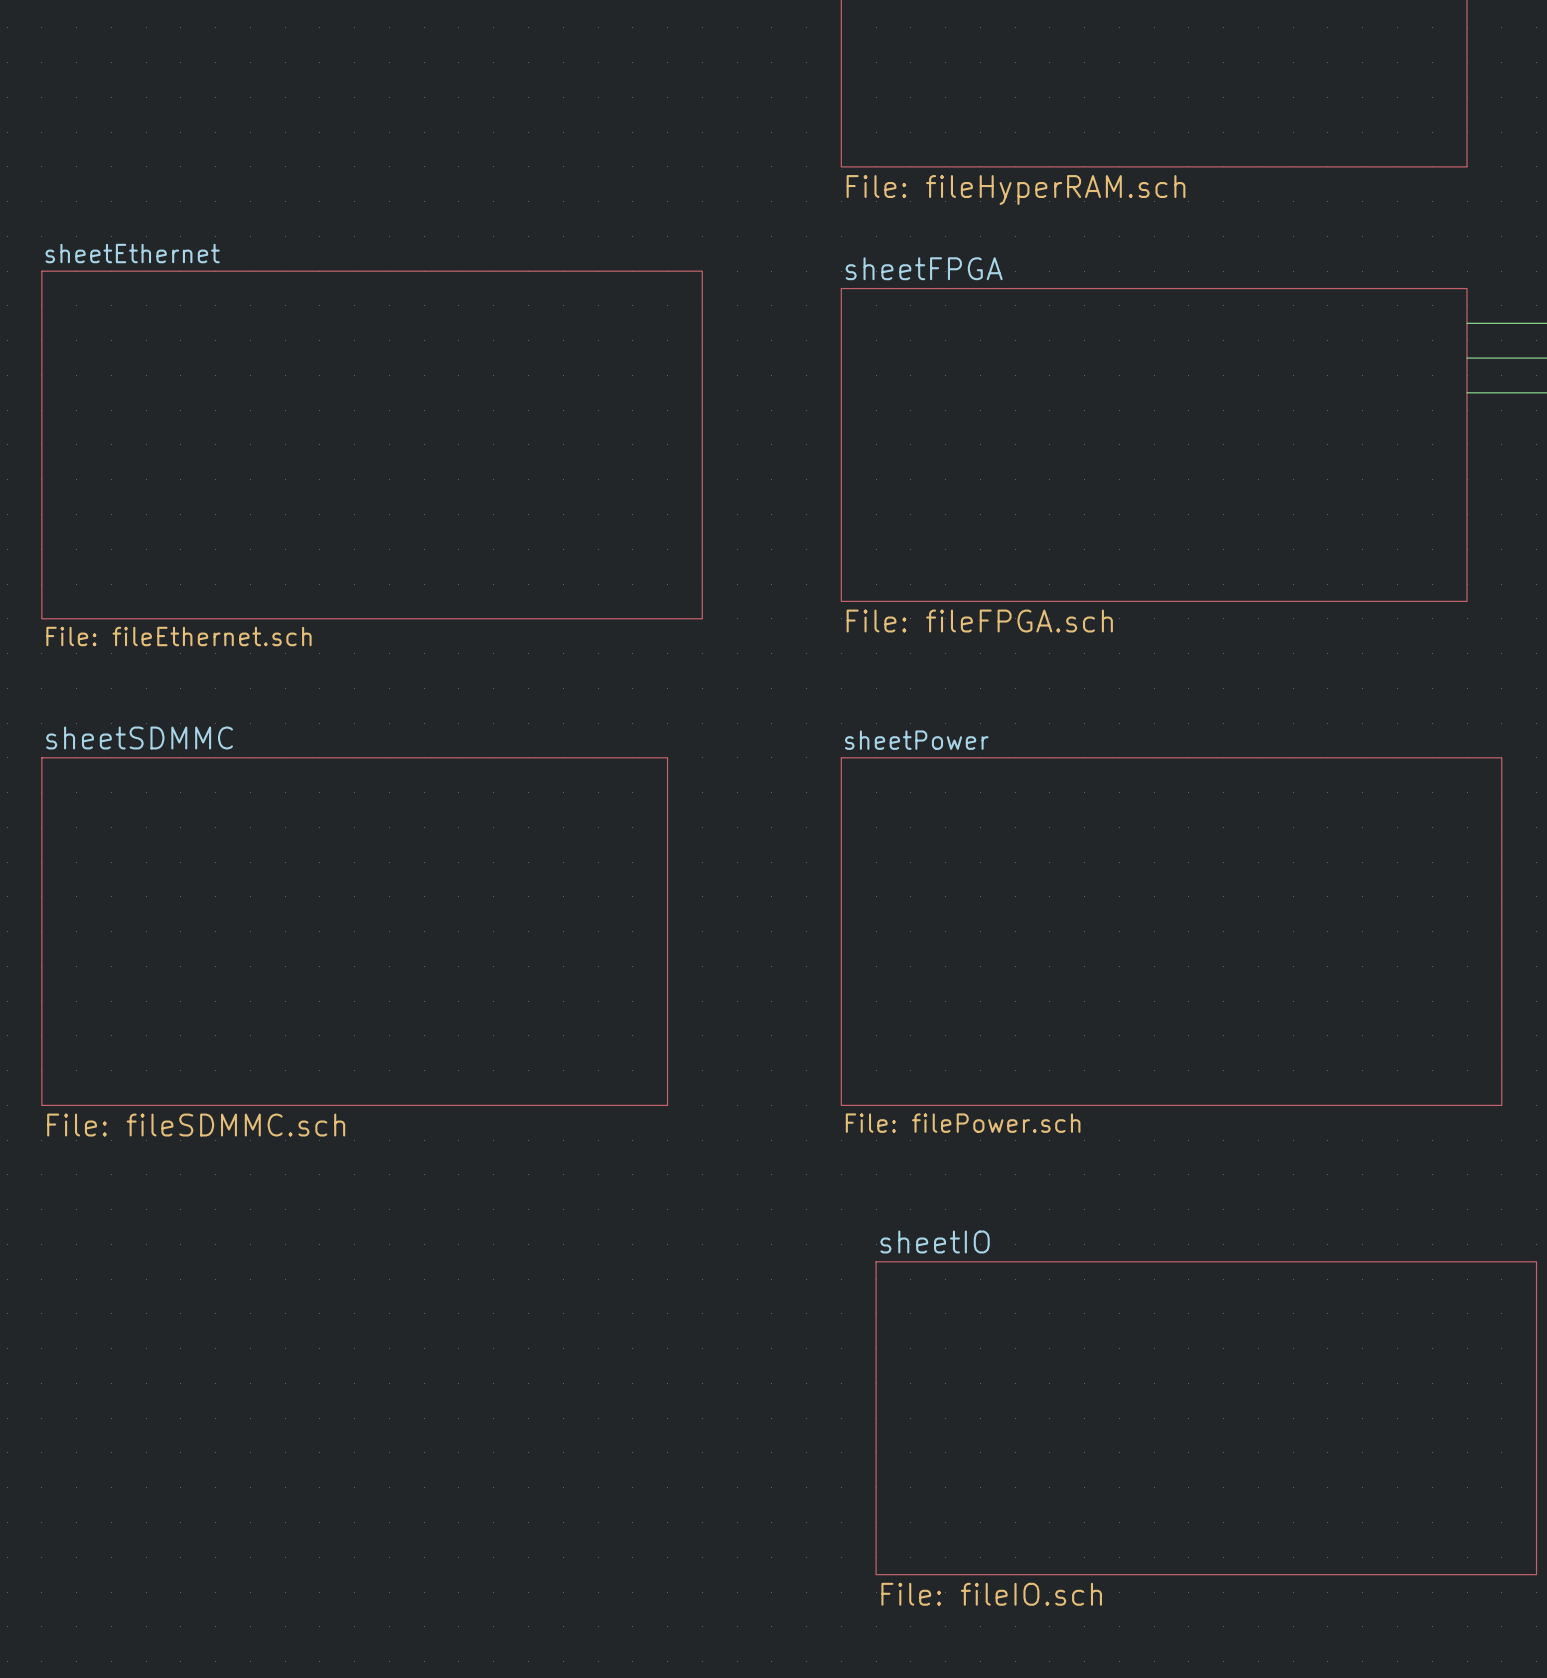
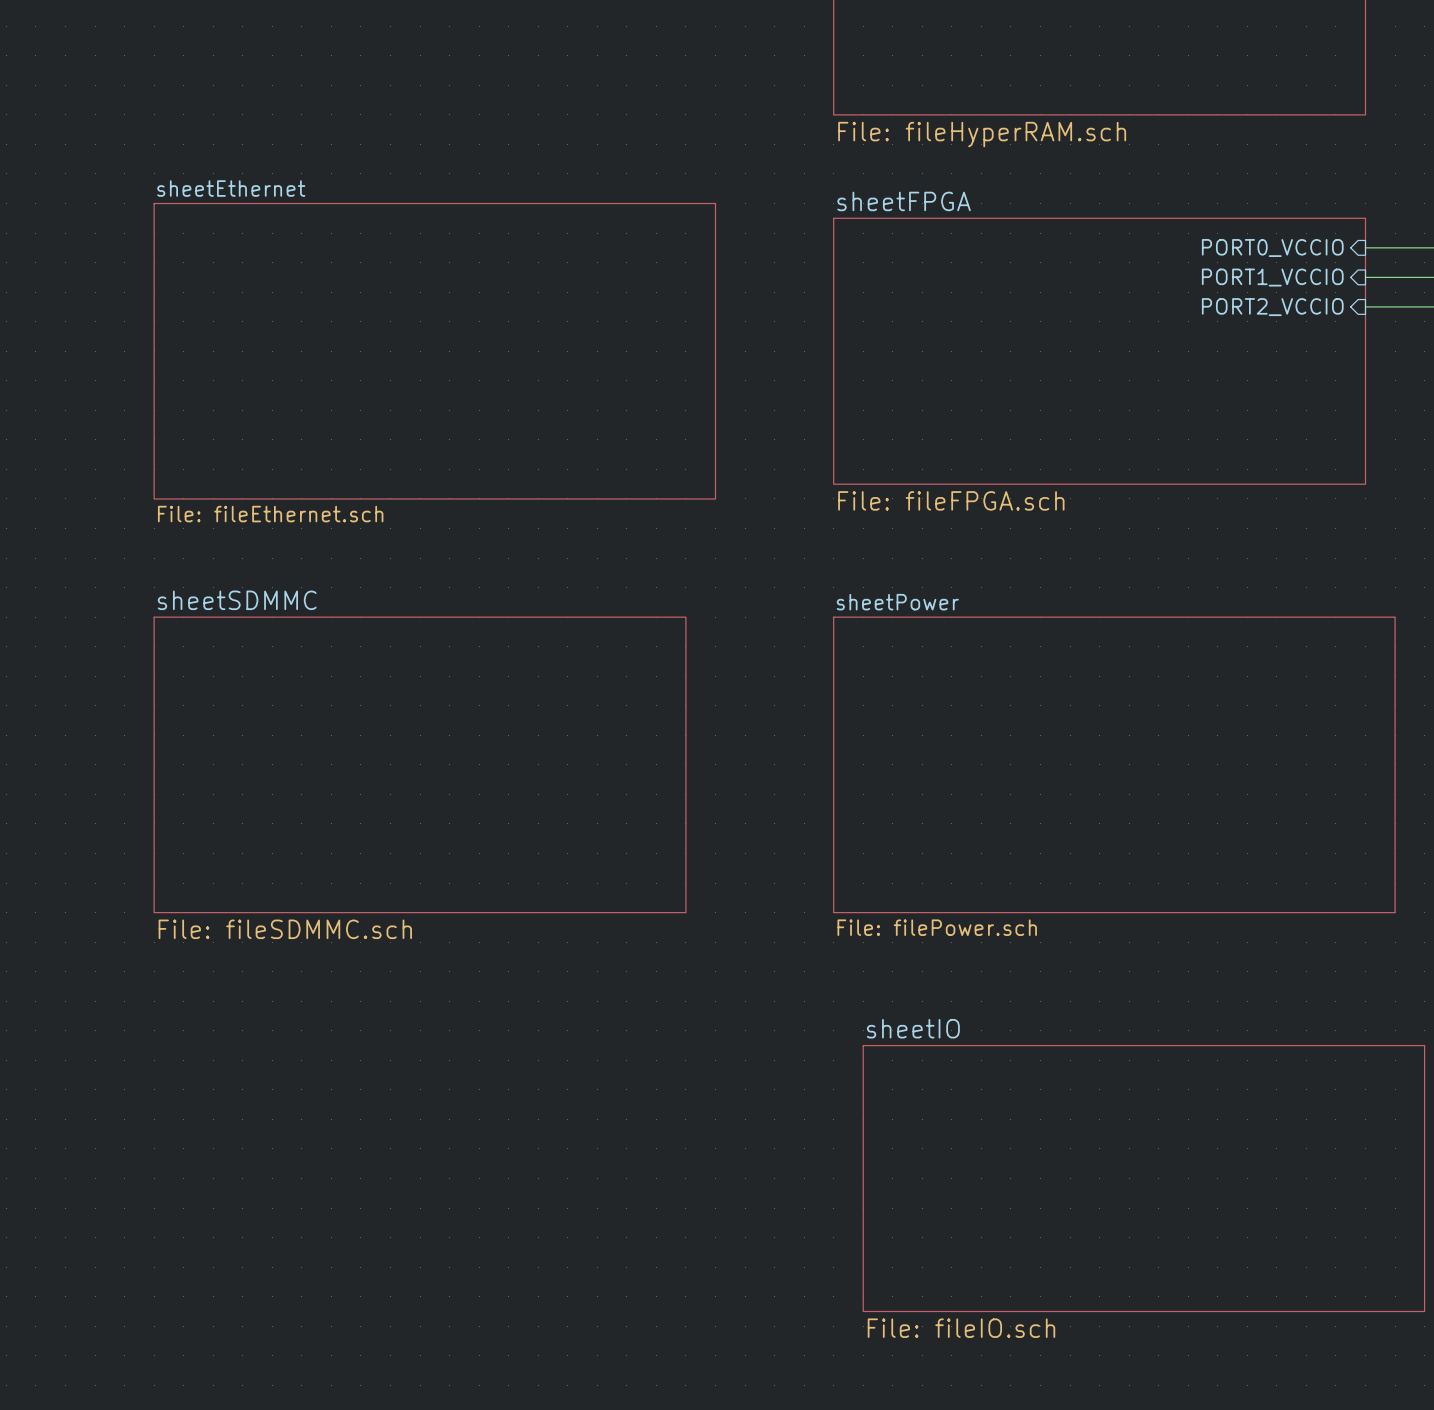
sheet pin: none -> PORT0_VCCIO (1272, 248)
sheet pin: none -> PORT1_VCCIO (1272, 277)
sheet pin: none -> PORT2_VCCIO (1272, 307)

